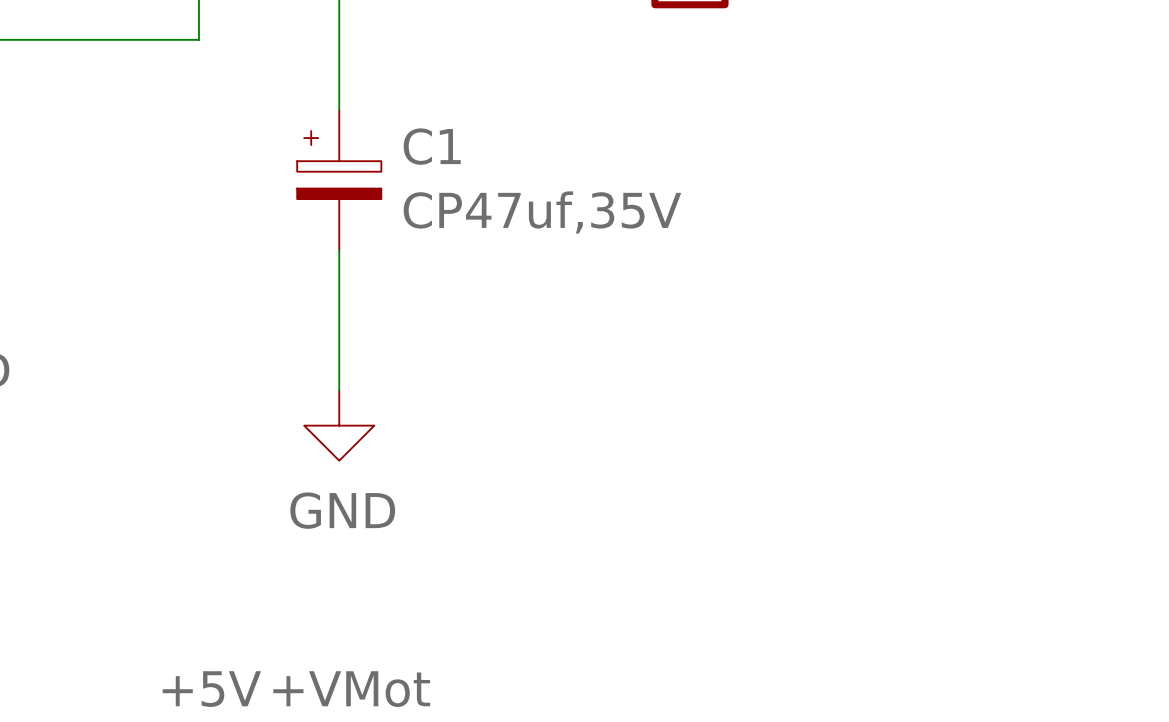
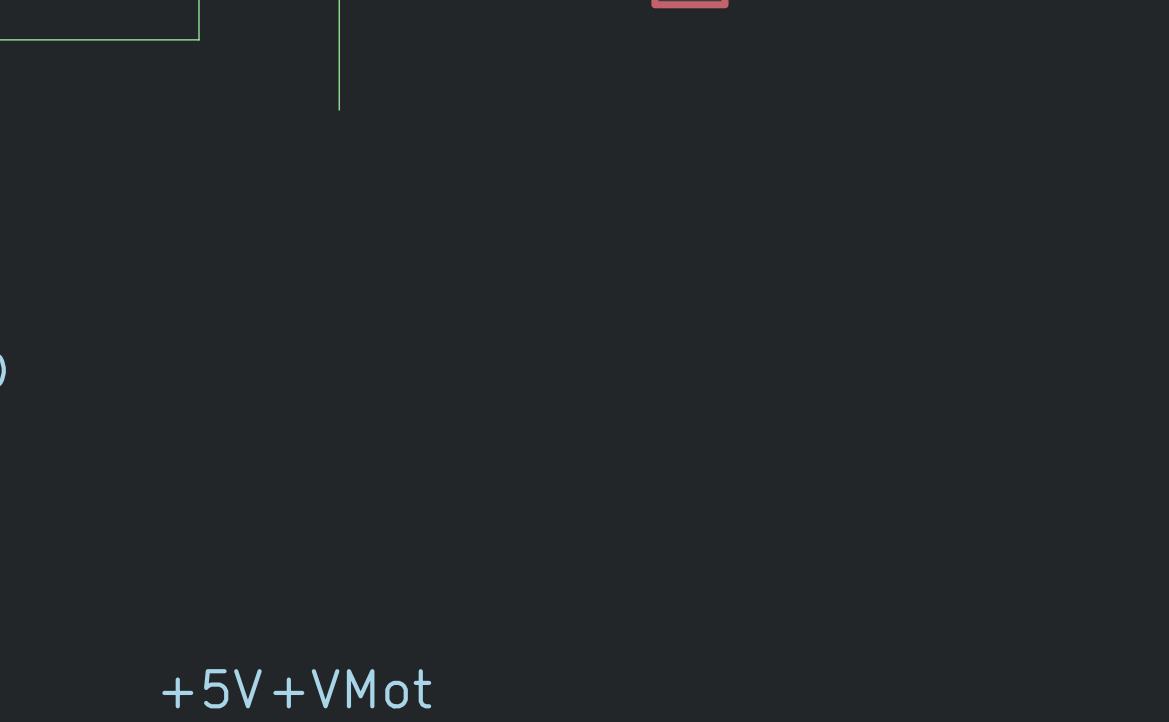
C1: CP47uf,35V (339, 180) -> none
wire: (339, 250) (339, 390) -> none
power symbol: GND (339, 425) -> none

